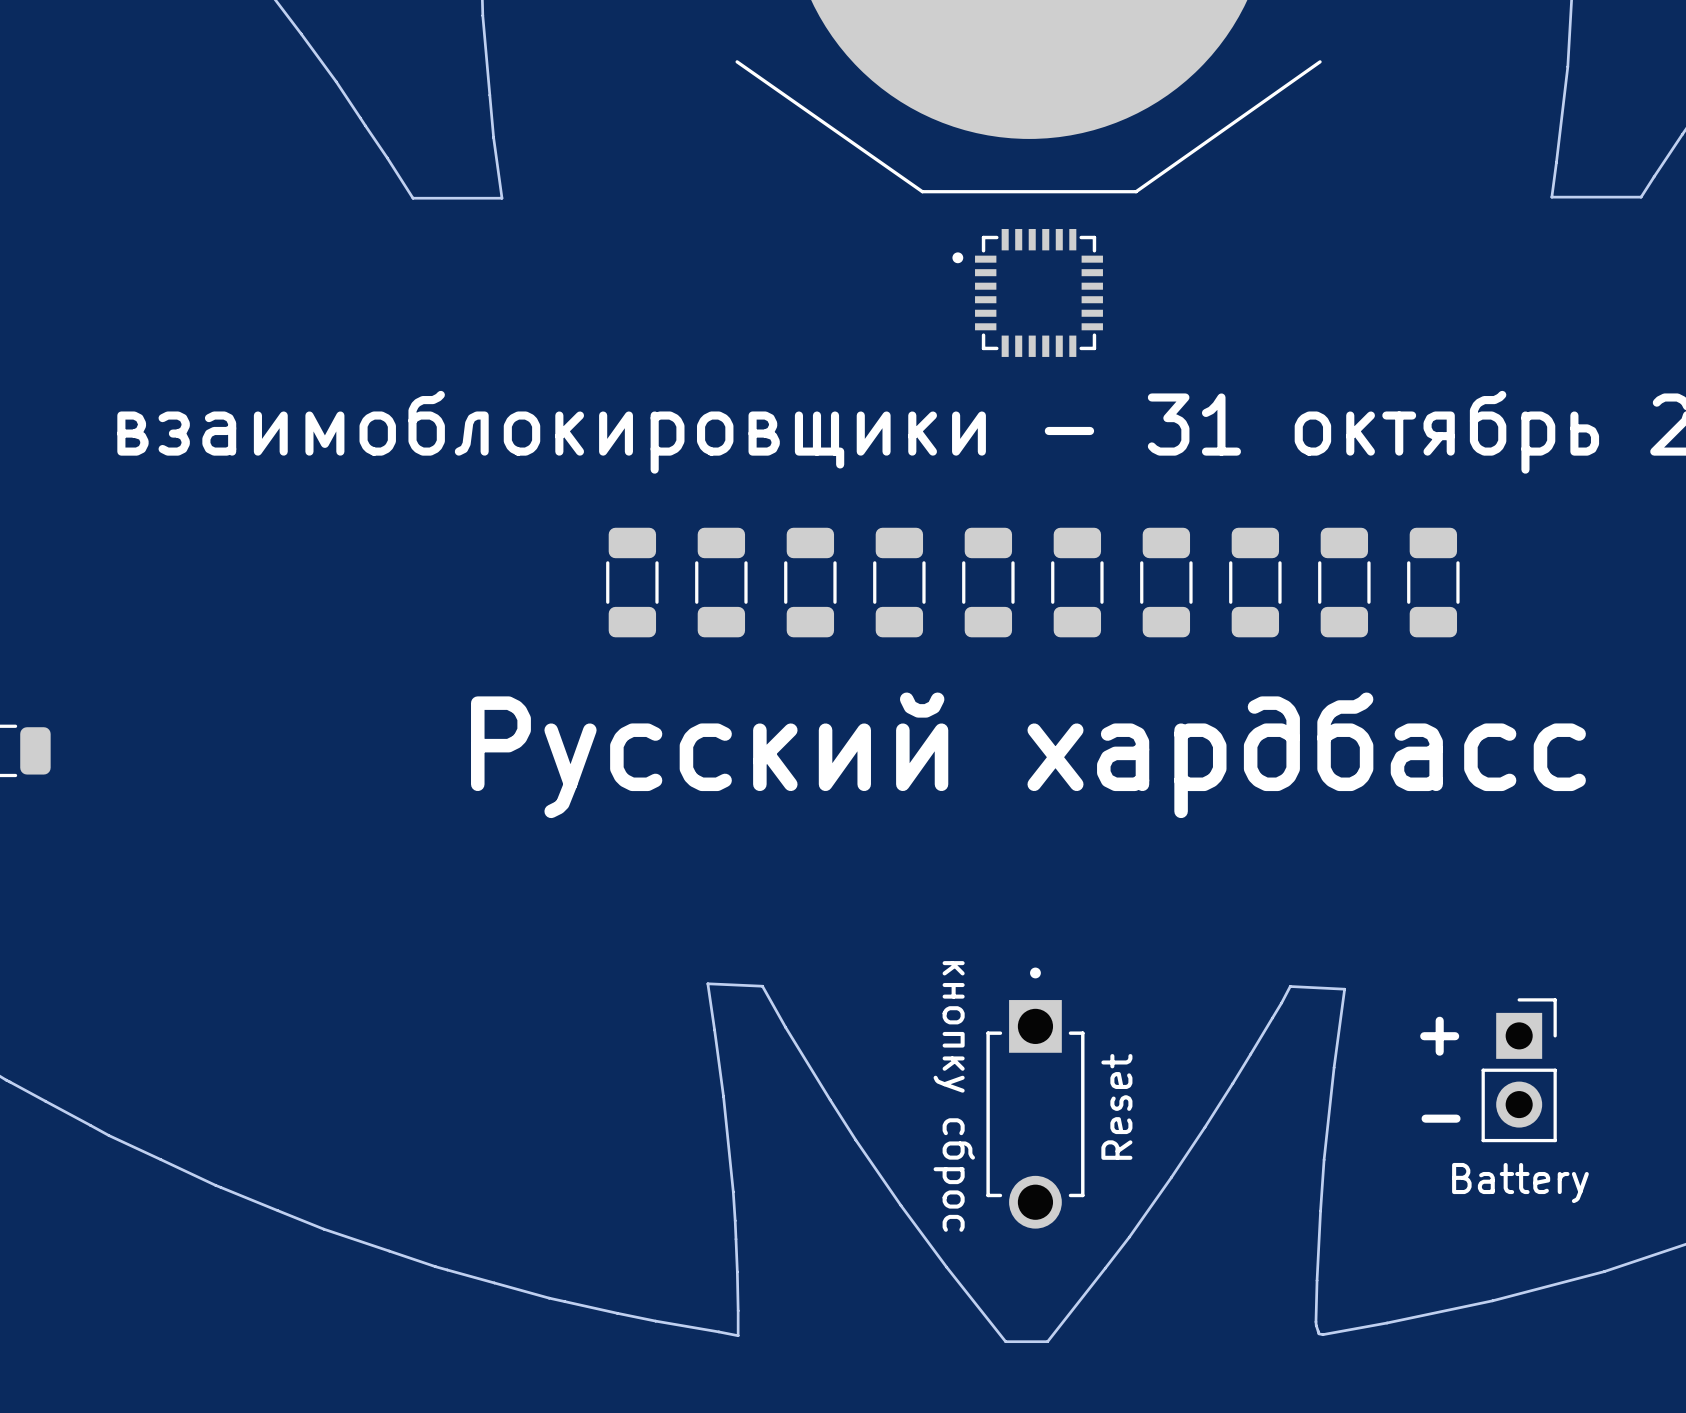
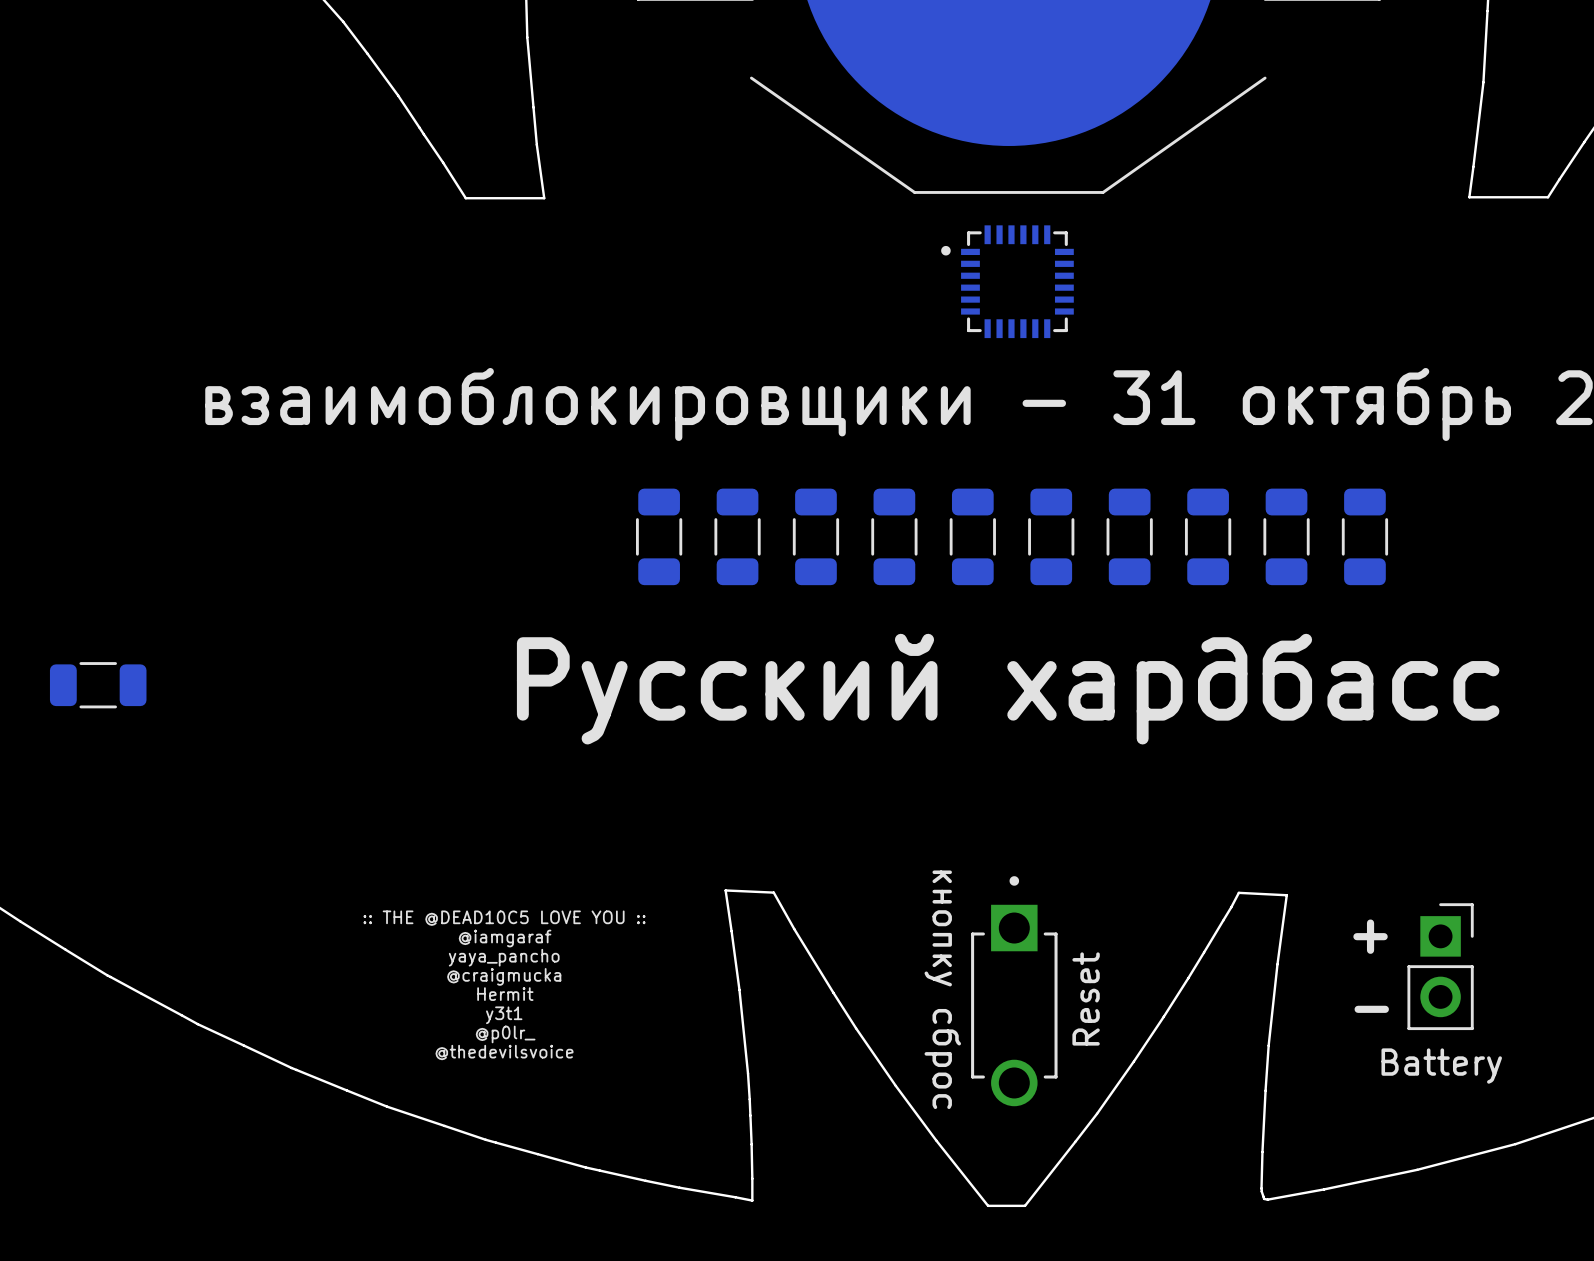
text: none -> :: THE @DEAD10C5 LOVE YOU :: (504, 918)
text: none -> @iamgaraf (505, 938)
text: none -> yaya_pancho (504, 957)
text: none -> @craigmucka (504, 976)
text: none -> Hermit (505, 994)
text: none -> y3t1 (504, 1015)
text: none -> @p0lr_ (505, 1034)
text: none -> @thedevilsvoice (504, 1052)

